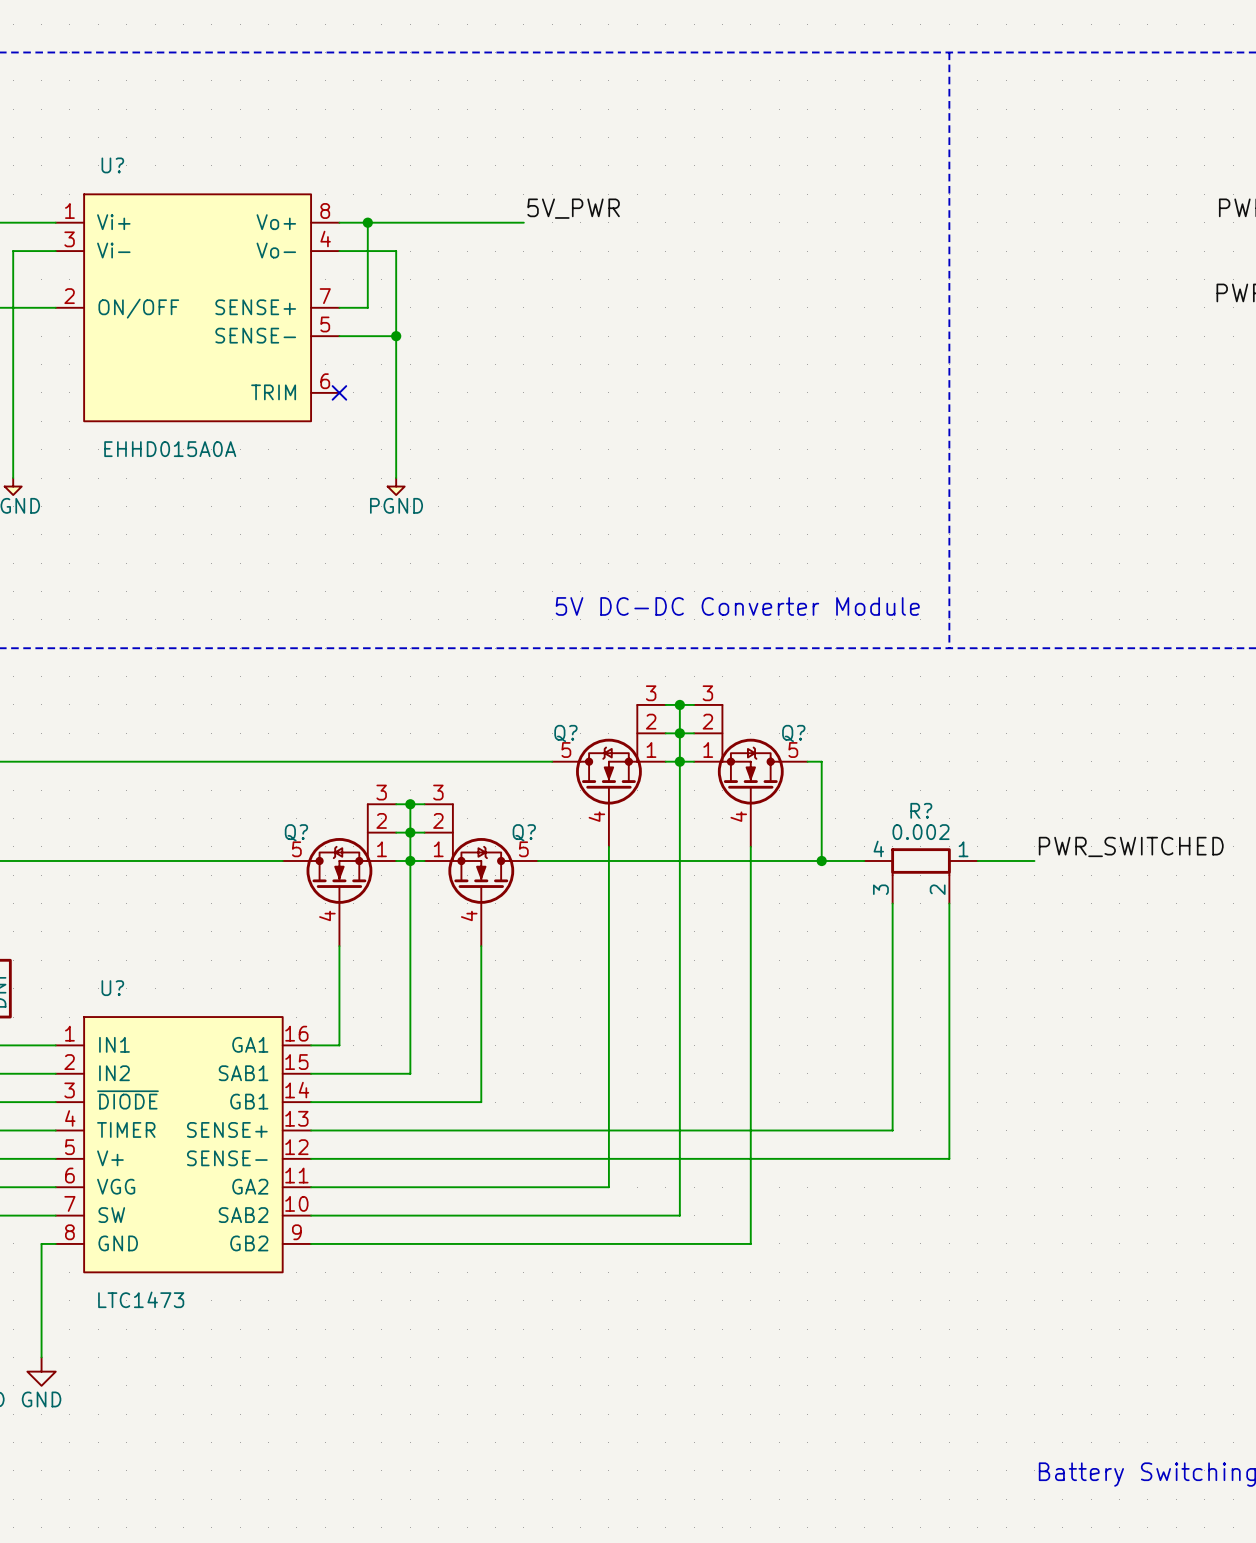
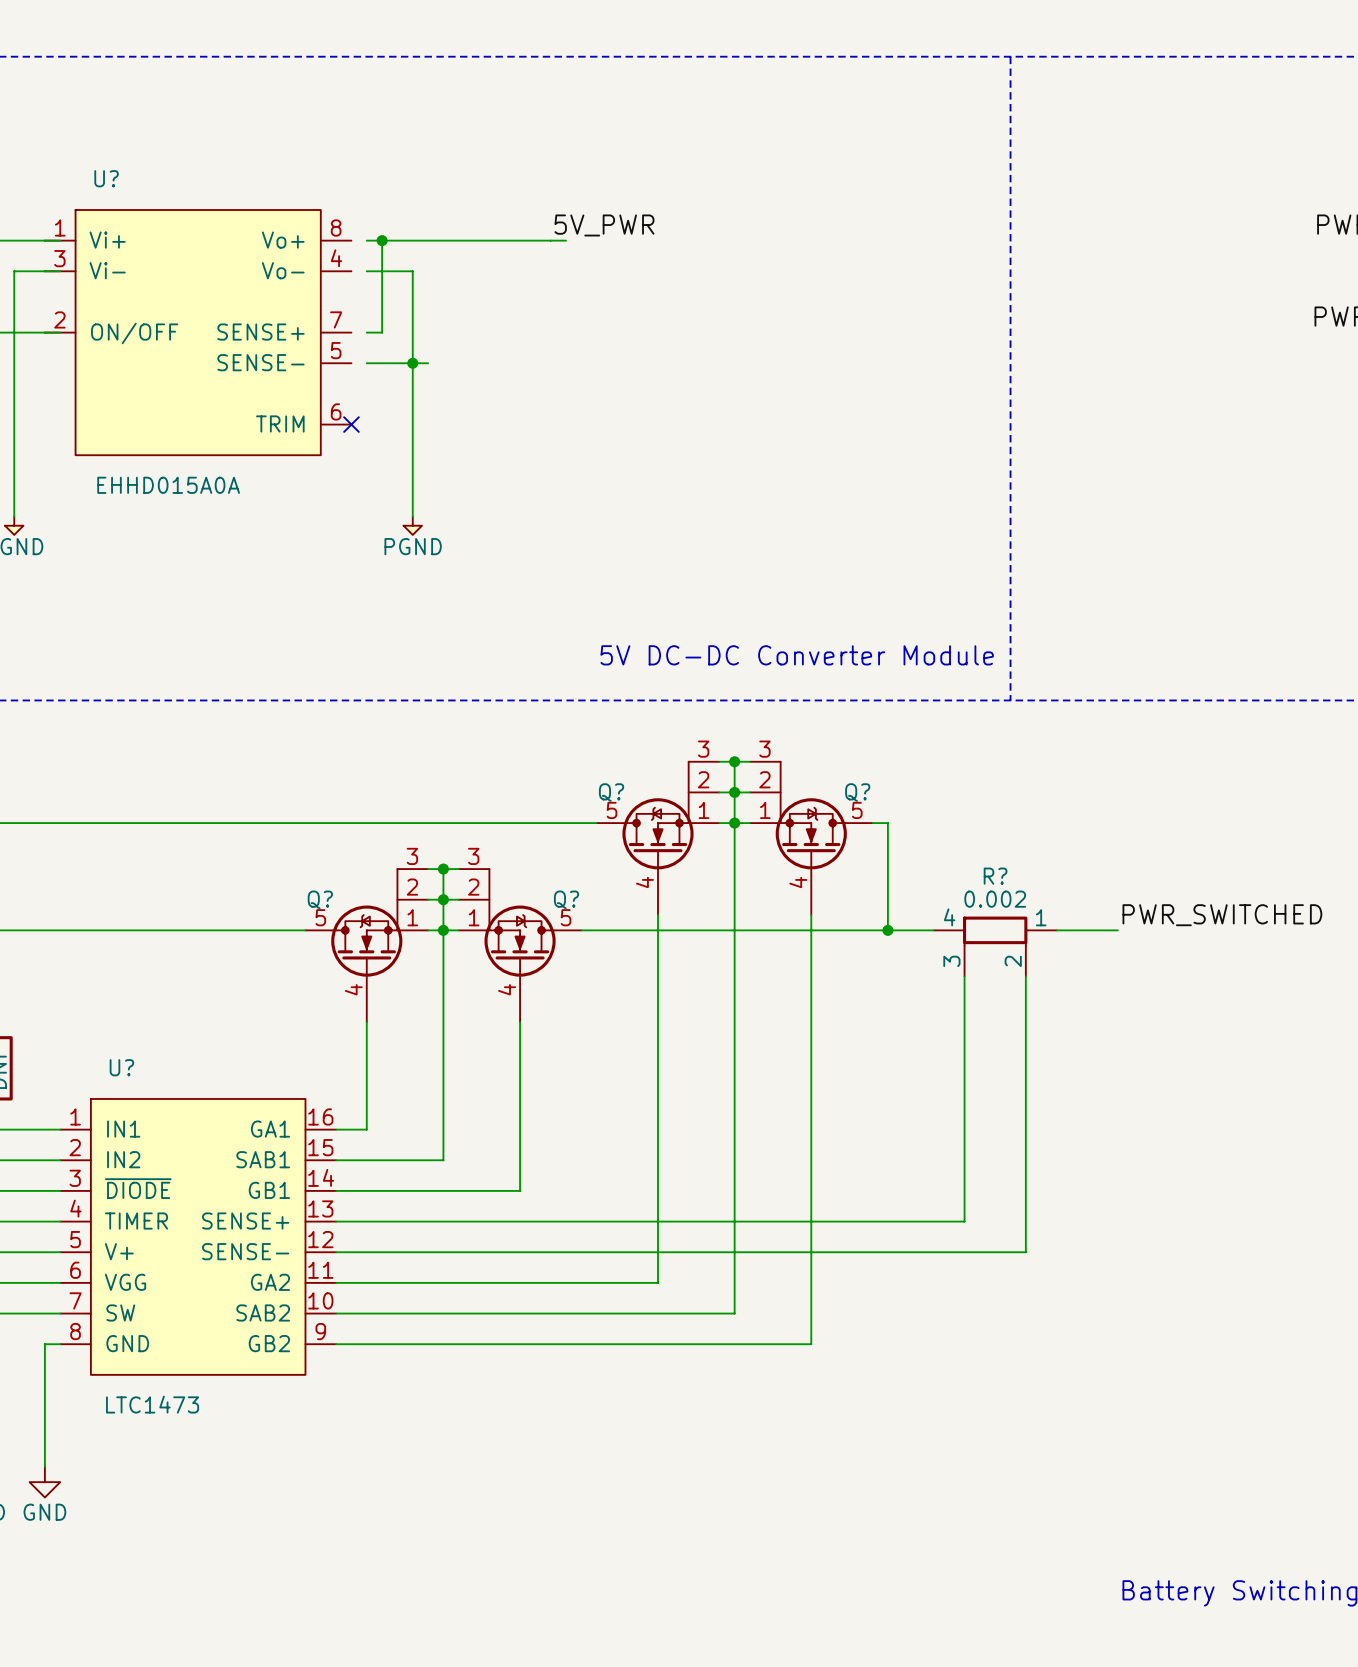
line: (949, 52) (949, 648) -> (1010, 56) (1010, 700)
label position: 5V_PWR (573, 208) -> 5V_PWR (604, 225)
wire: (367, 222) (367, 307) (353, 307) -> (382, 240) (382, 332)
junction position: (367, 222) -> (382, 240)
wire: (381, 251) (396, 251) (396, 478) -> (412, 271) (412, 516)
U? position: (197, 307) -> (198, 332)
junction position: (396, 336) -> (412, 363)
no-connect mark position: (339, 392) -> (351, 424)
power symbol position: PGND (396, 486) -> PGND (412, 525)

